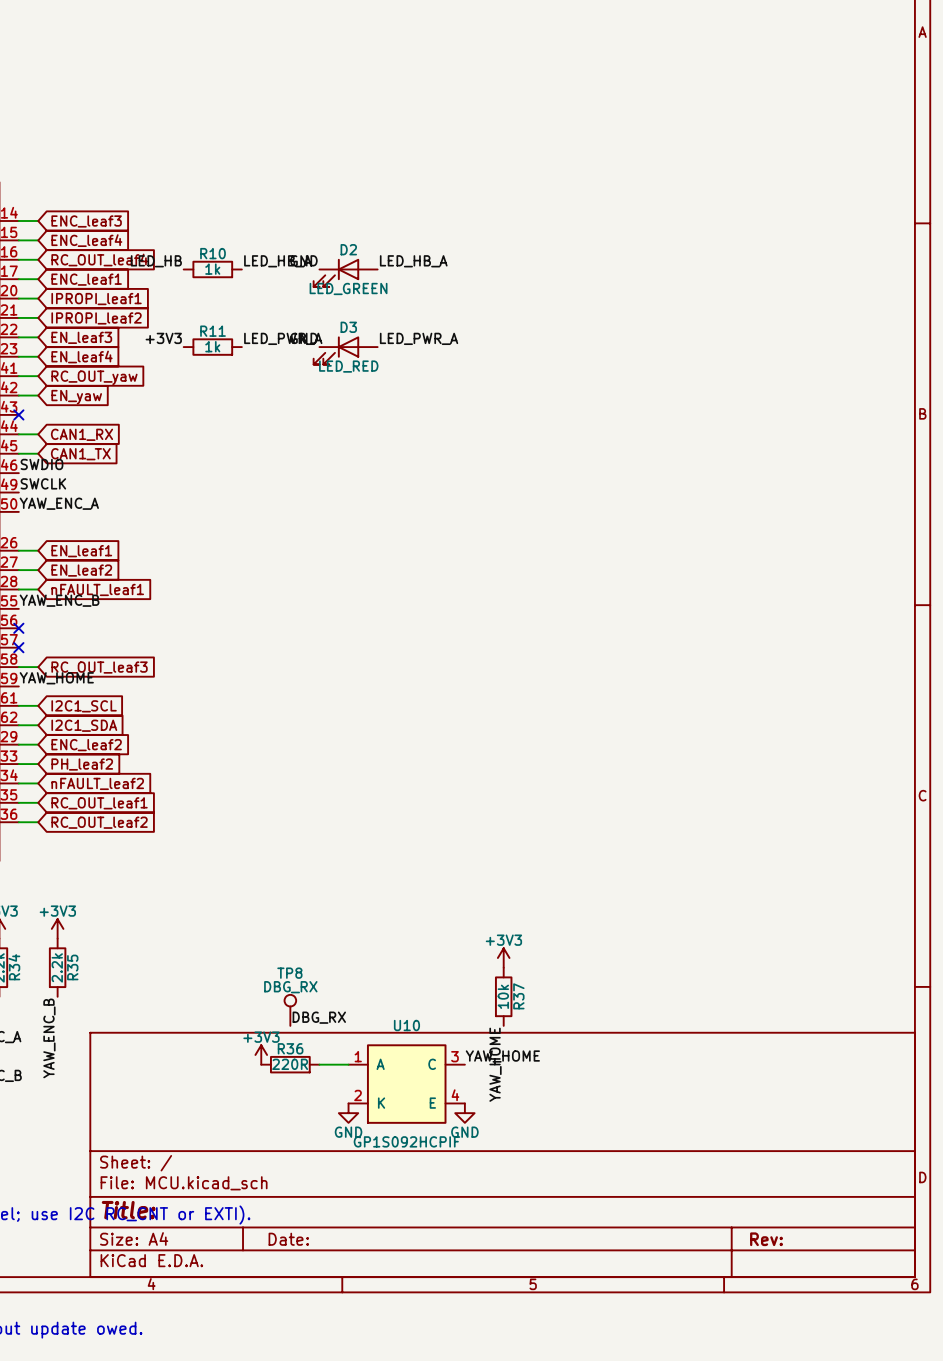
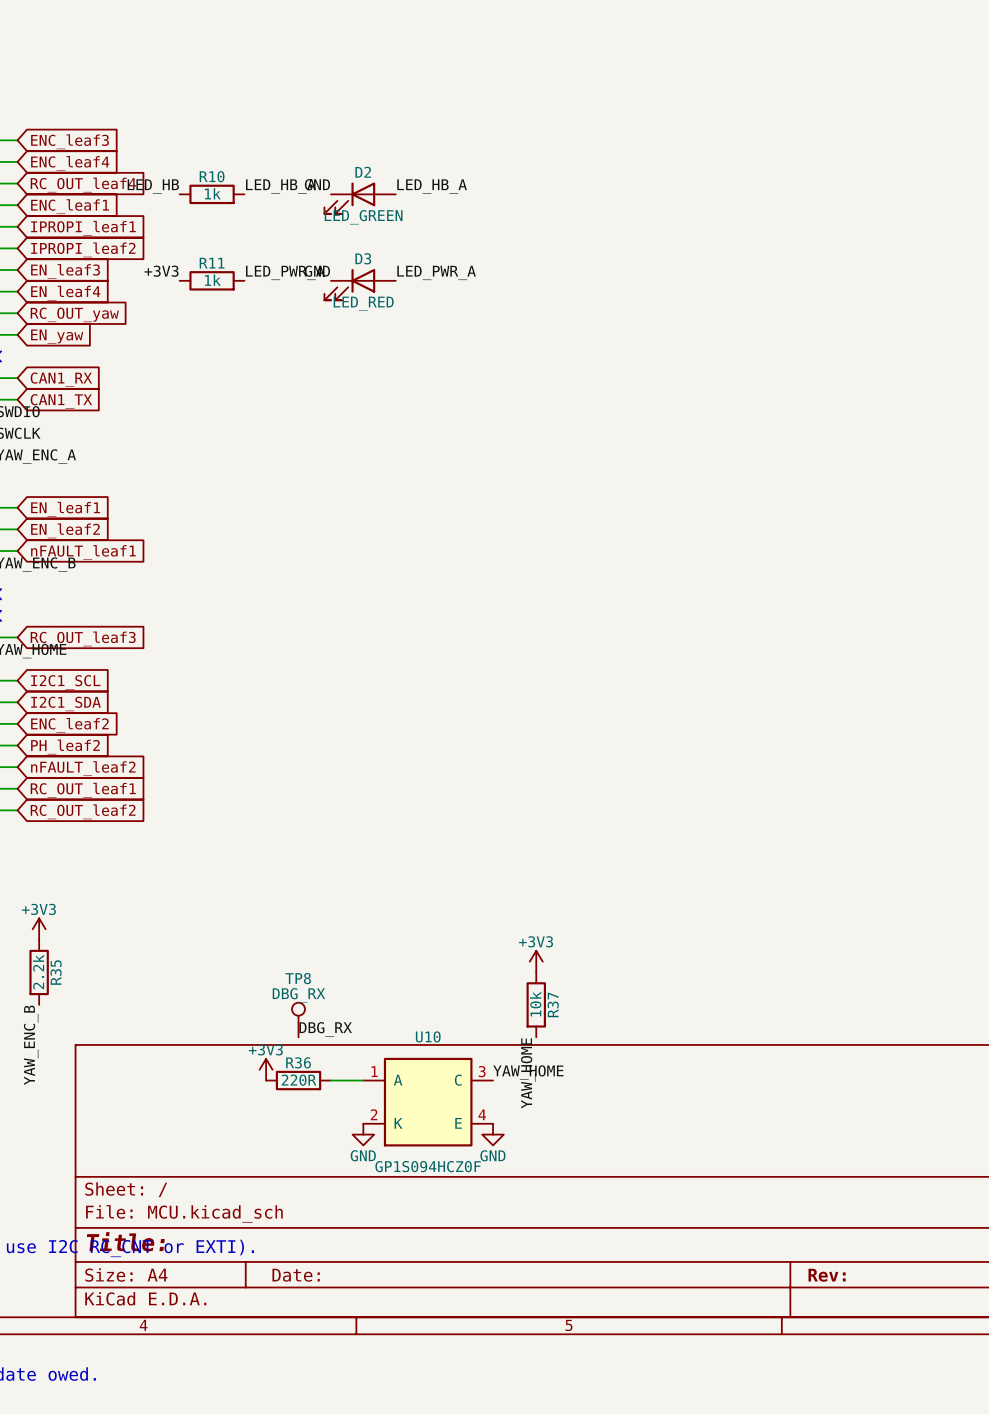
U10 value: GP1S092HCPIF (406, 1141) -> GP1S094HCZ0F (428, 1166)

